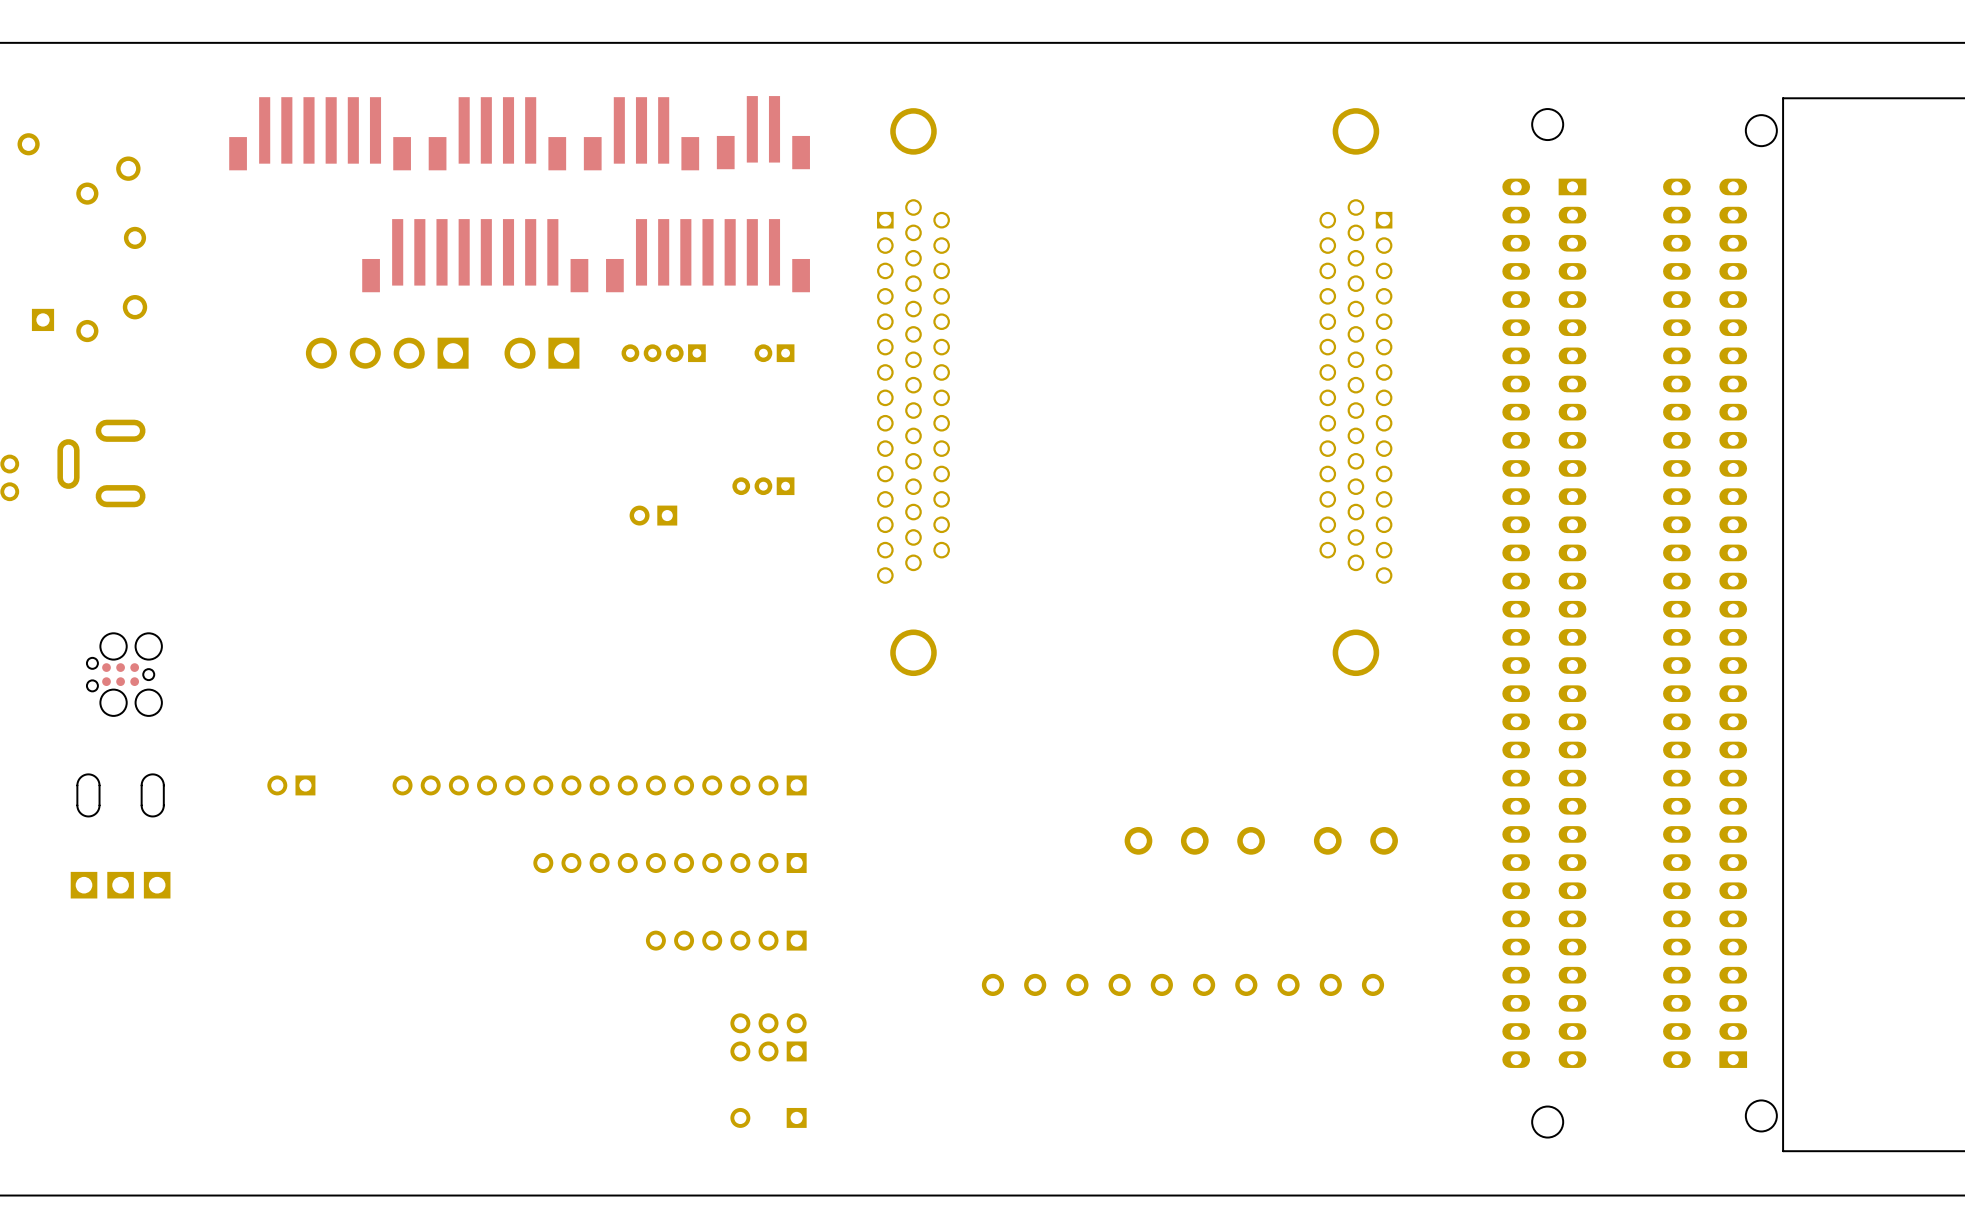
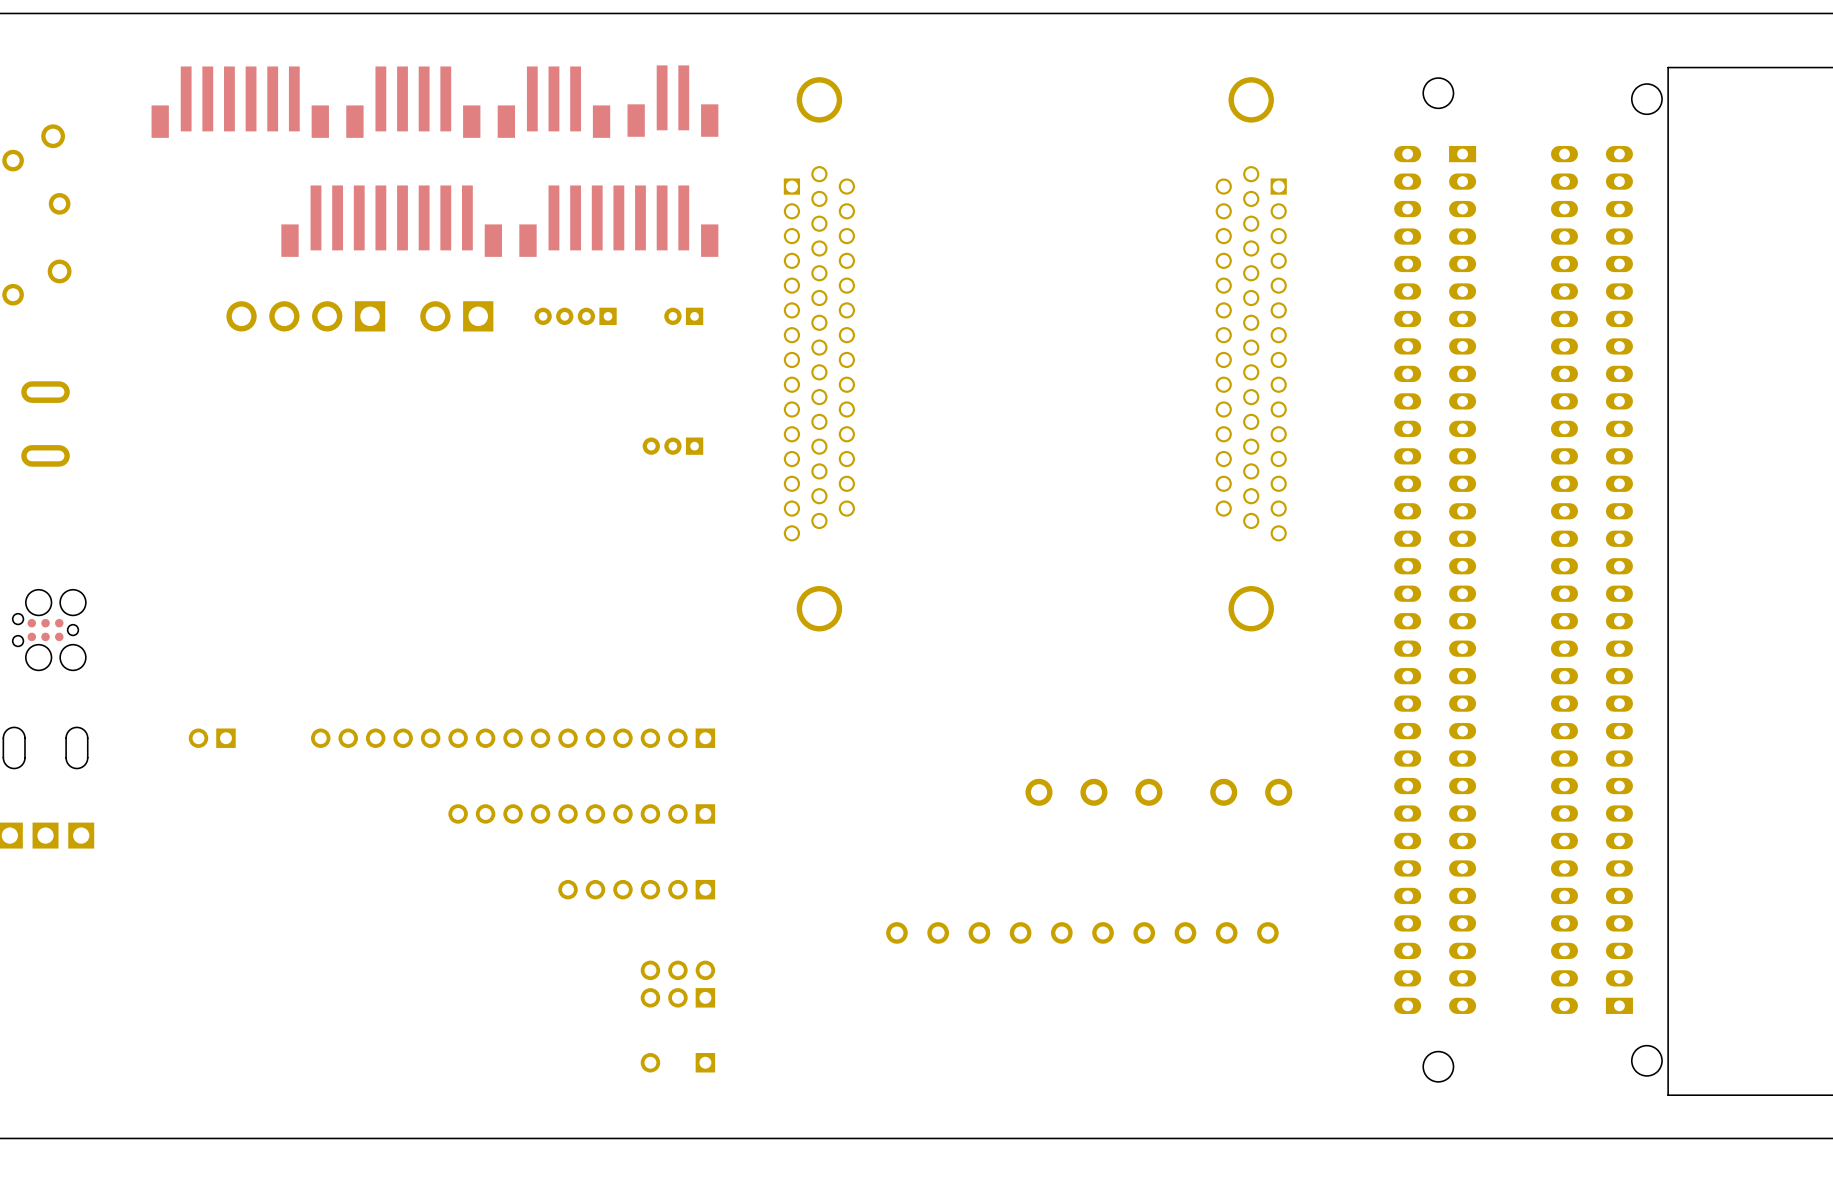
part: (653, 515) -> none

